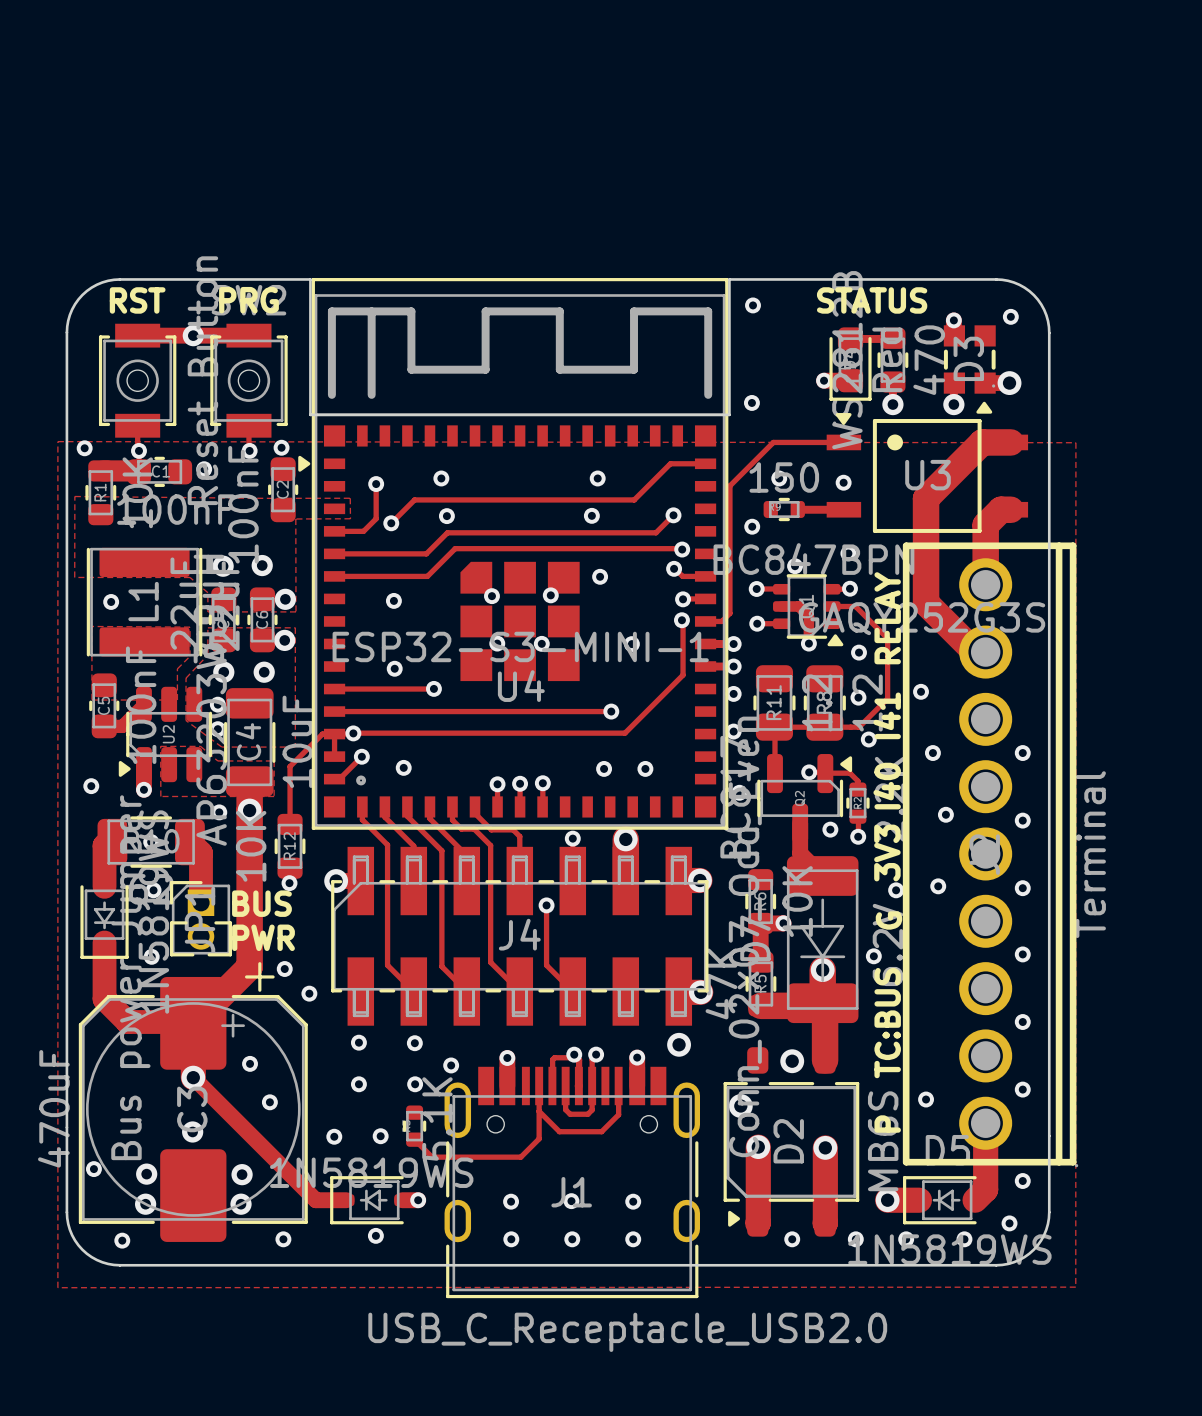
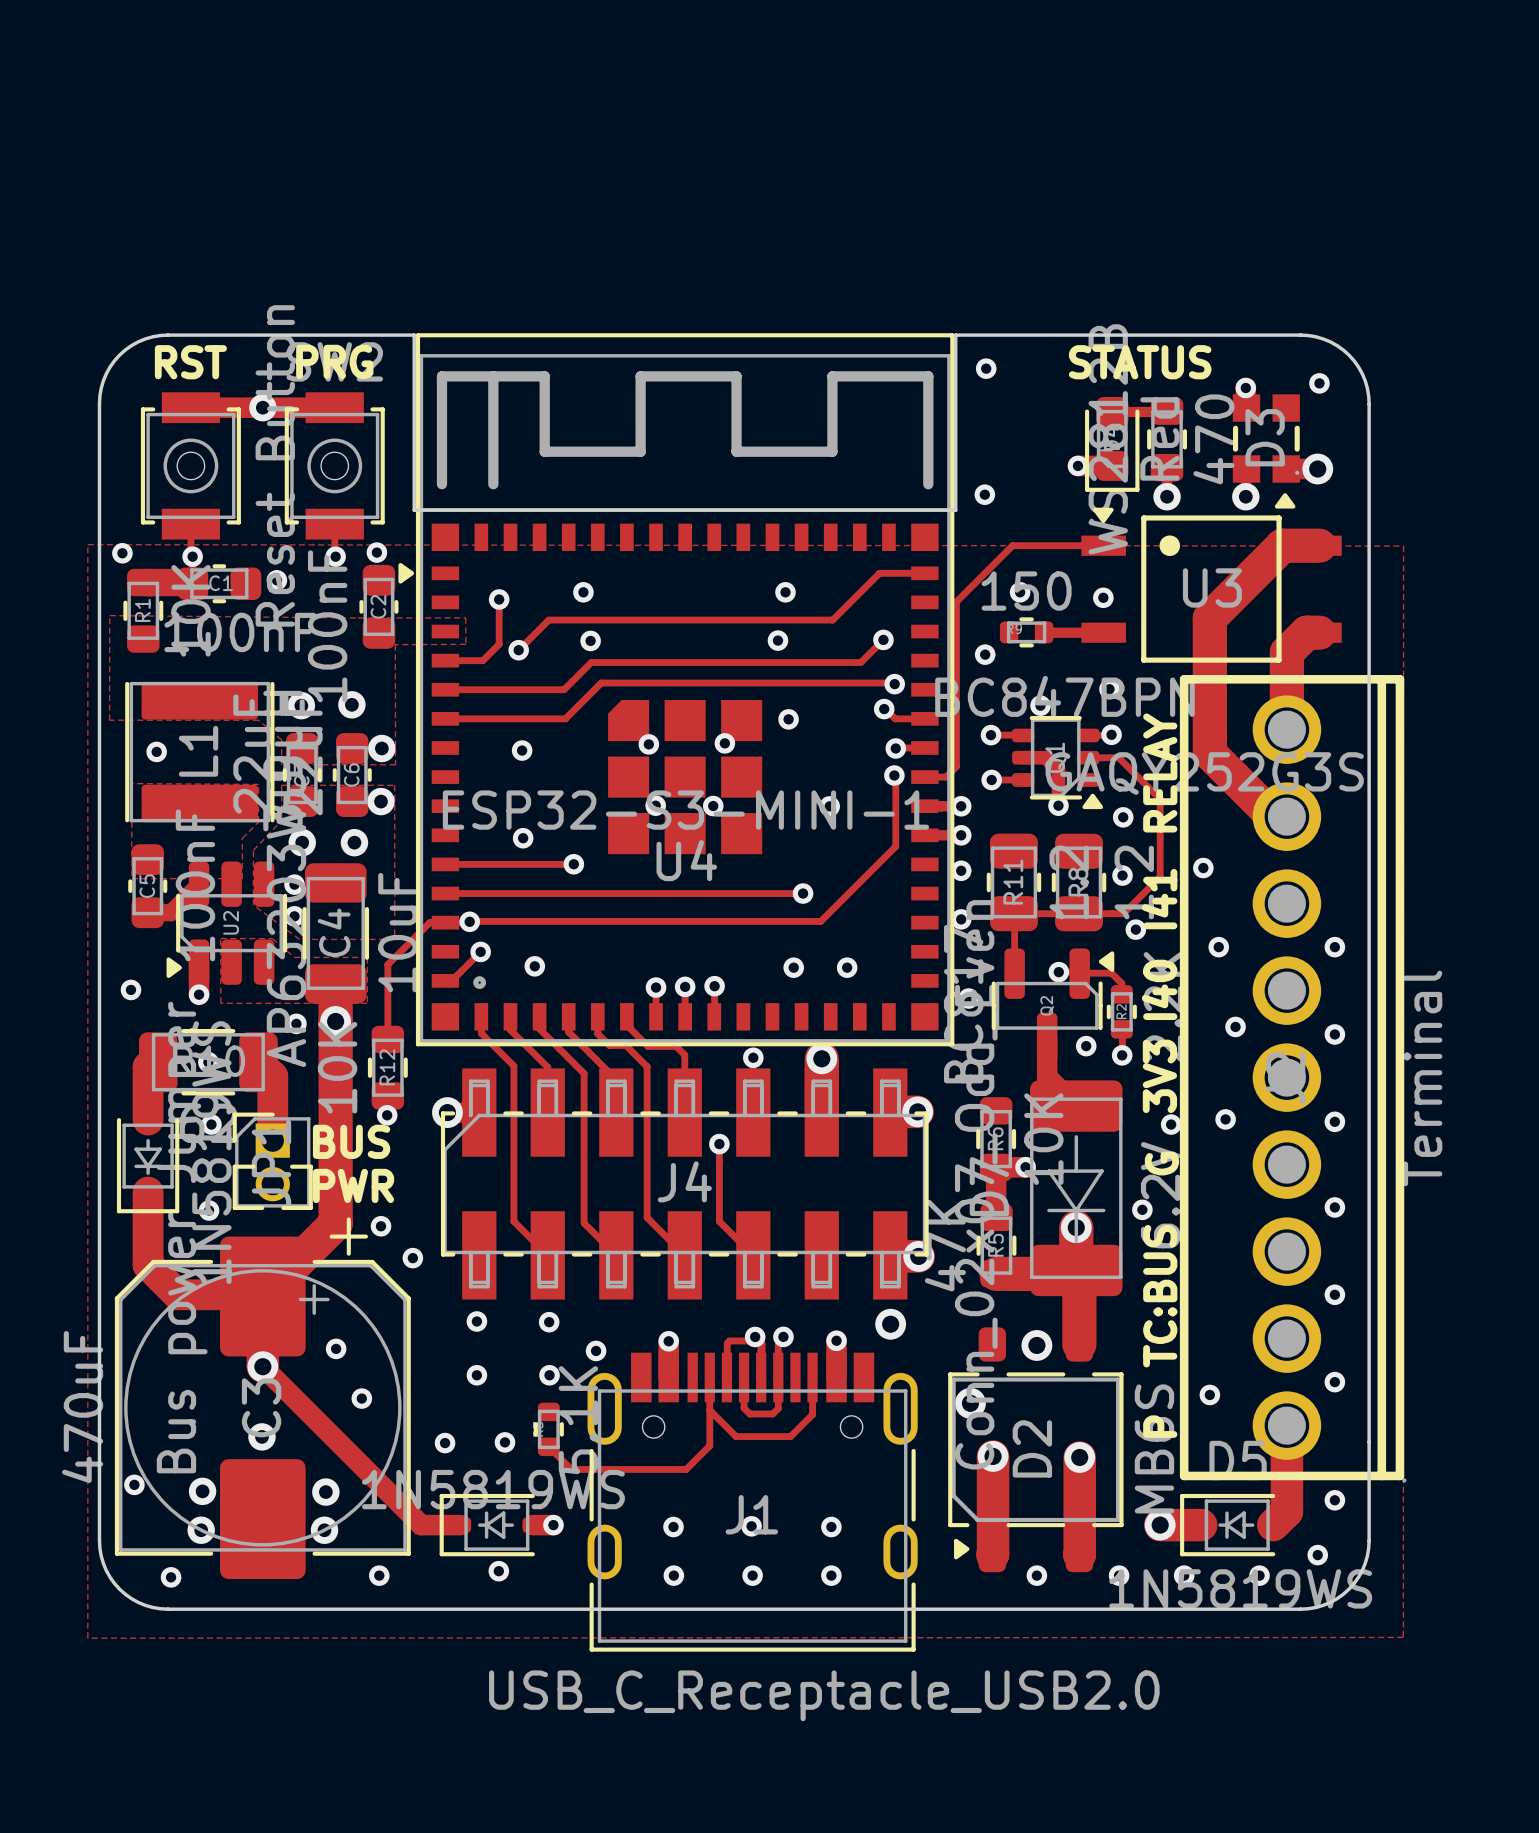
track: (334, 734) (334, 756) -> none

